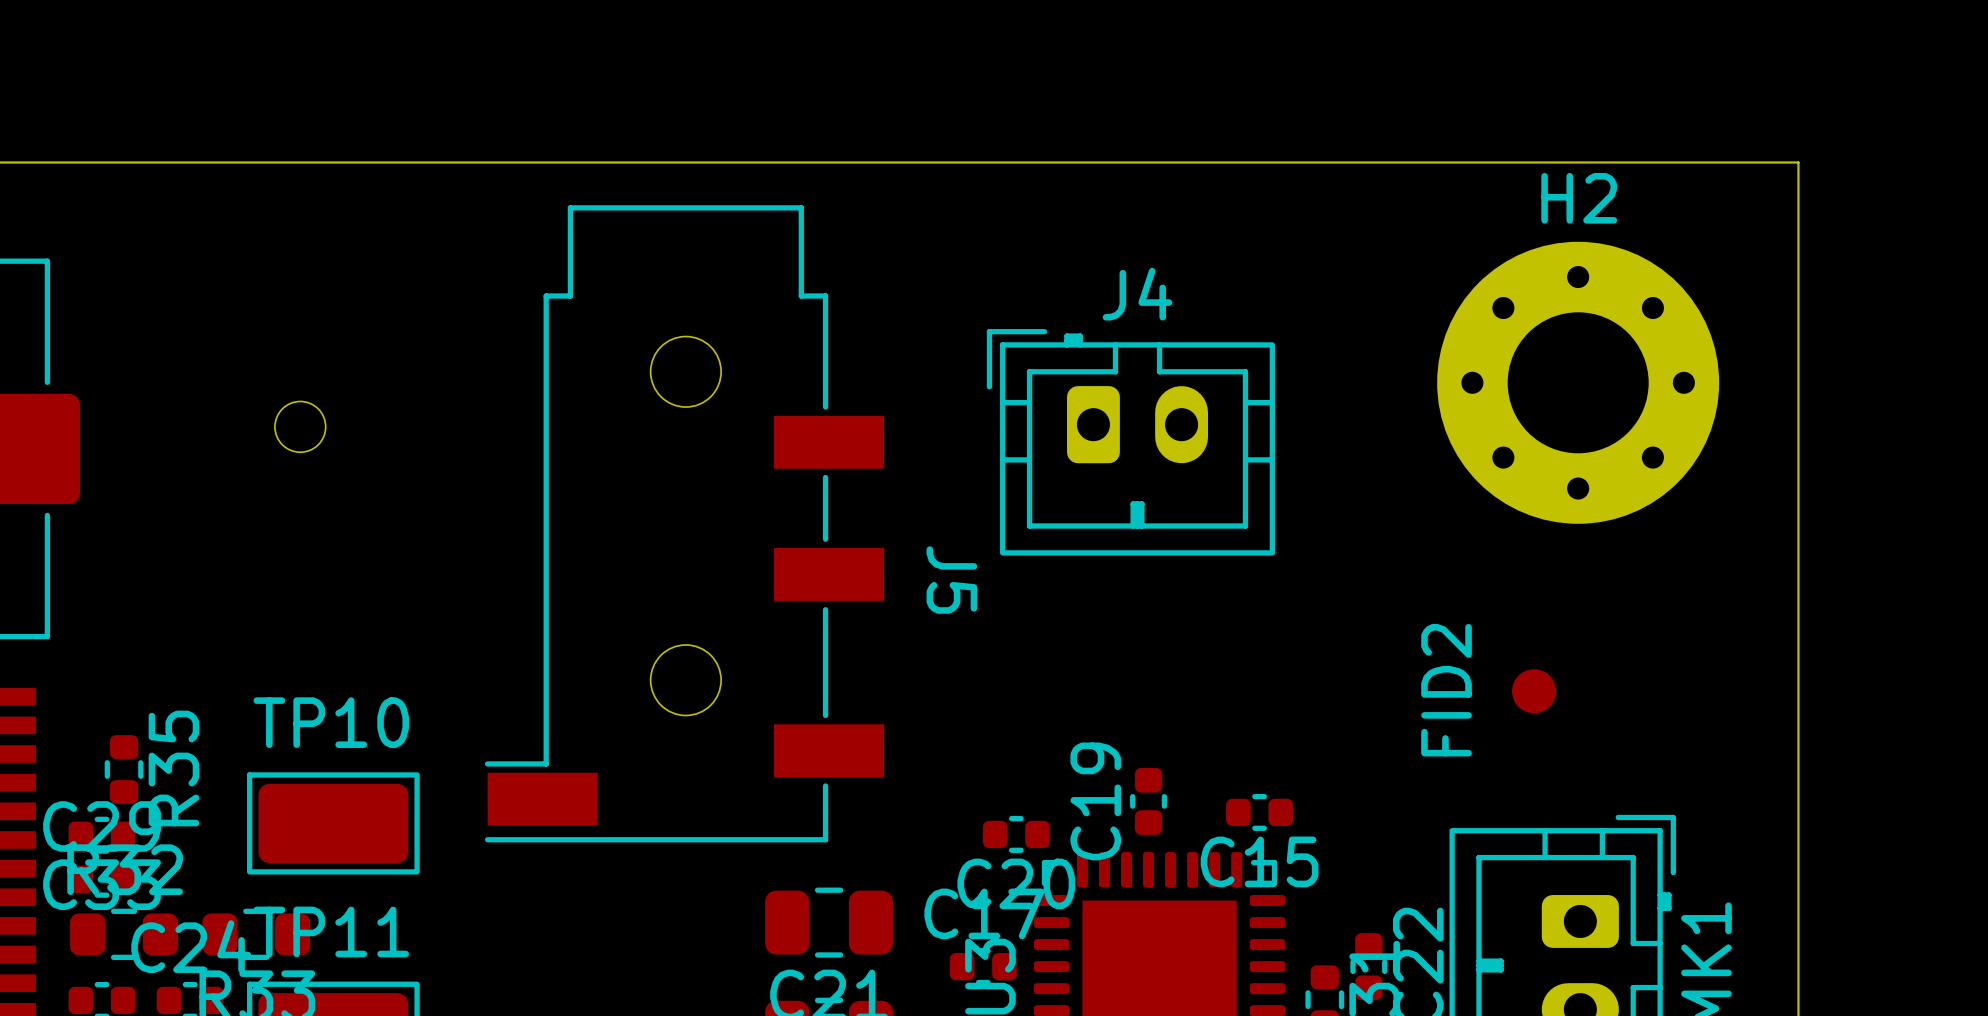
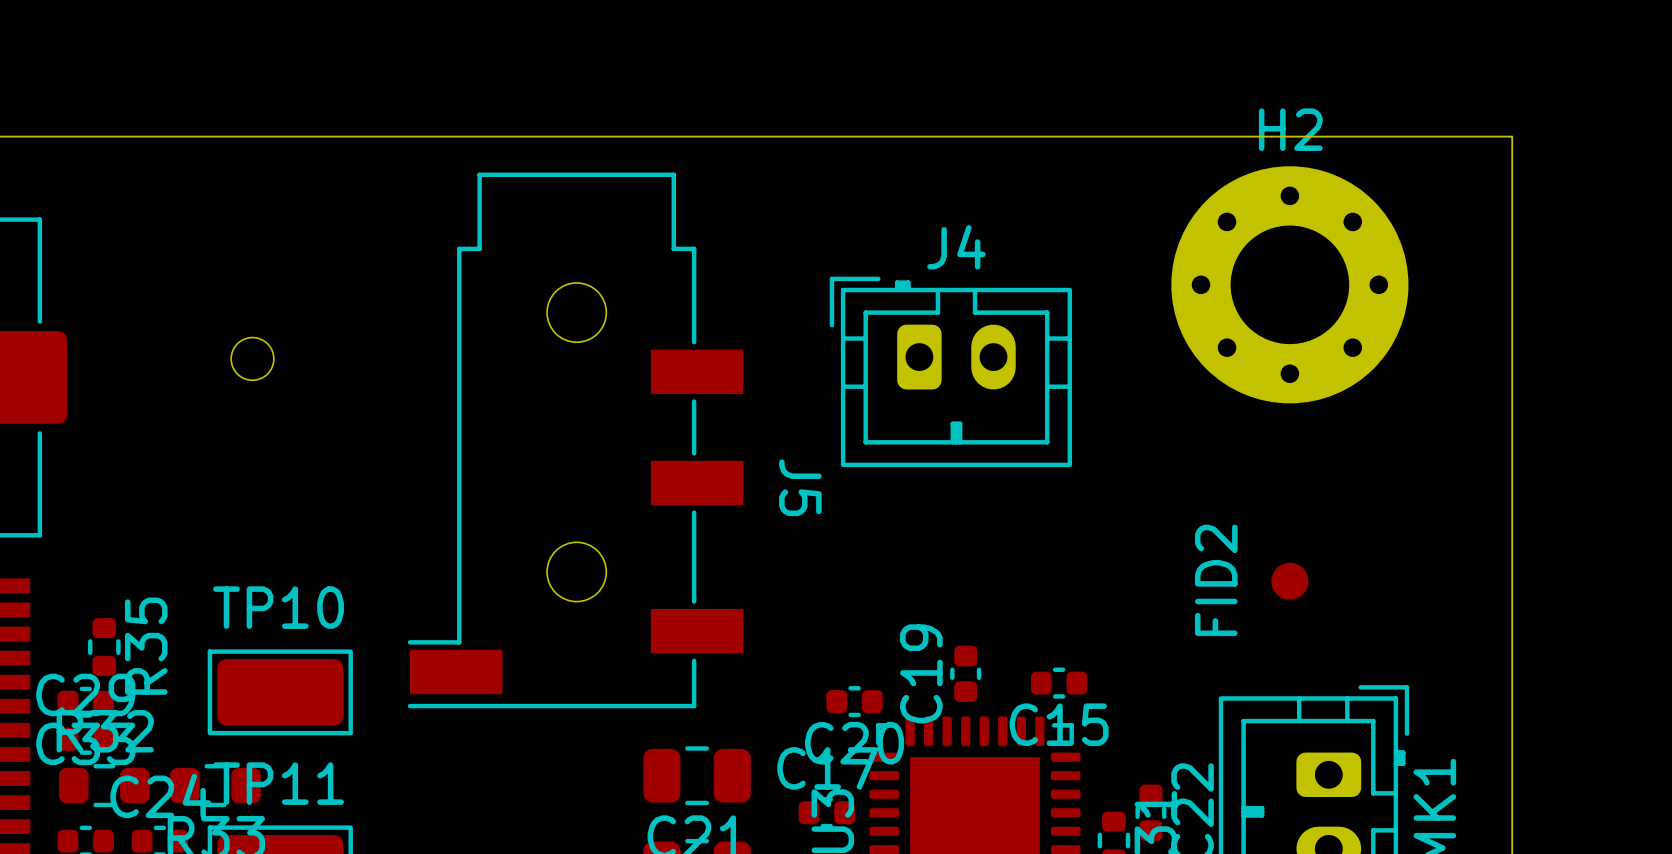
H2 position: (1578, 382) -> (1289, 284)

